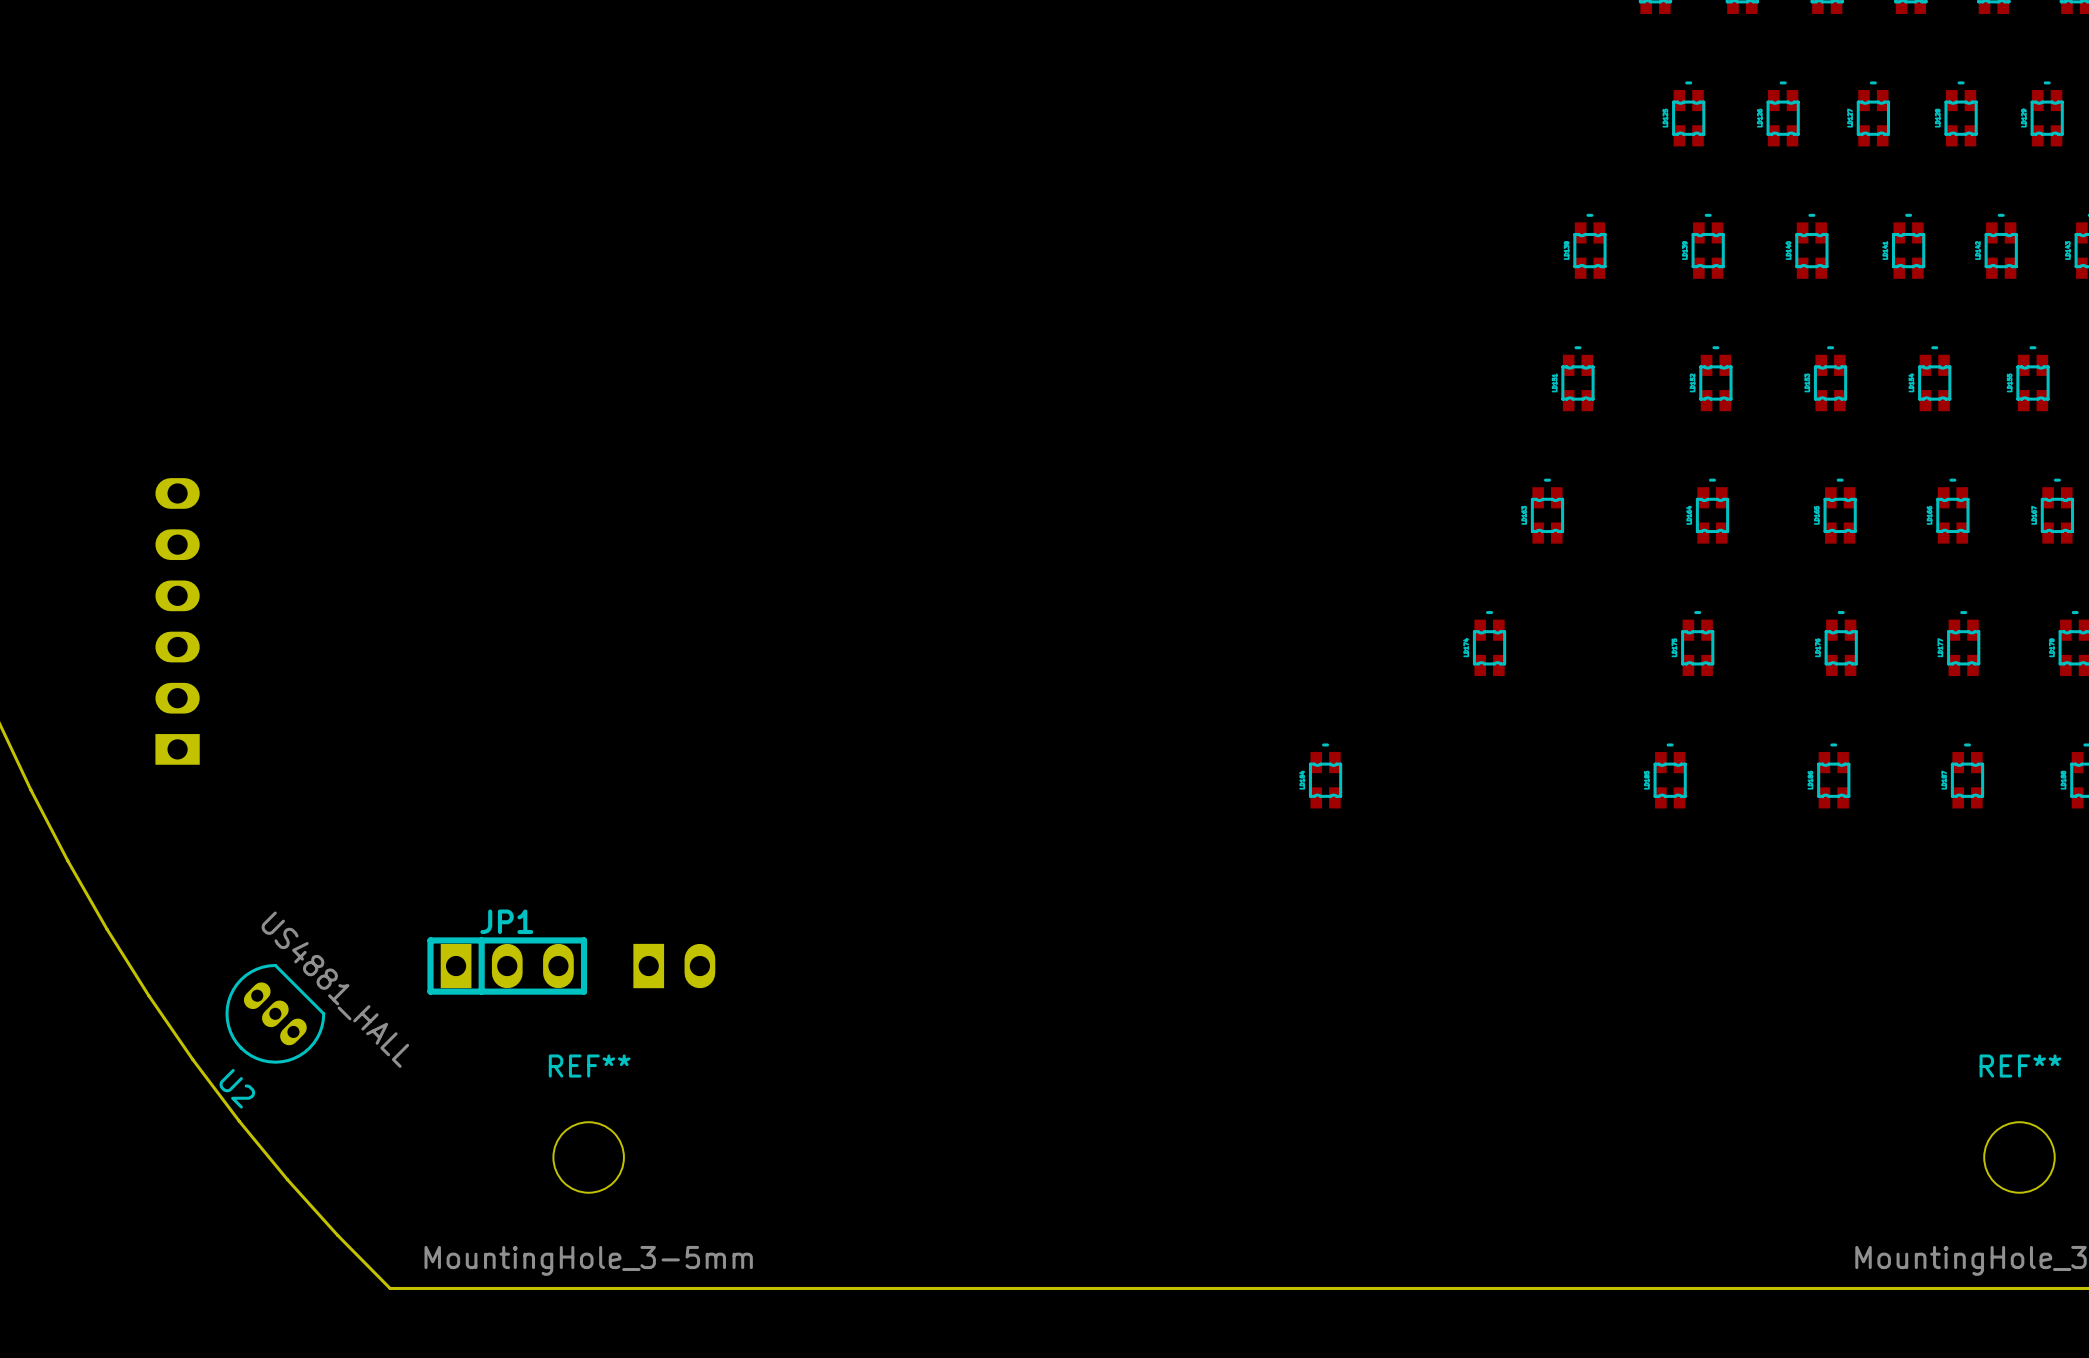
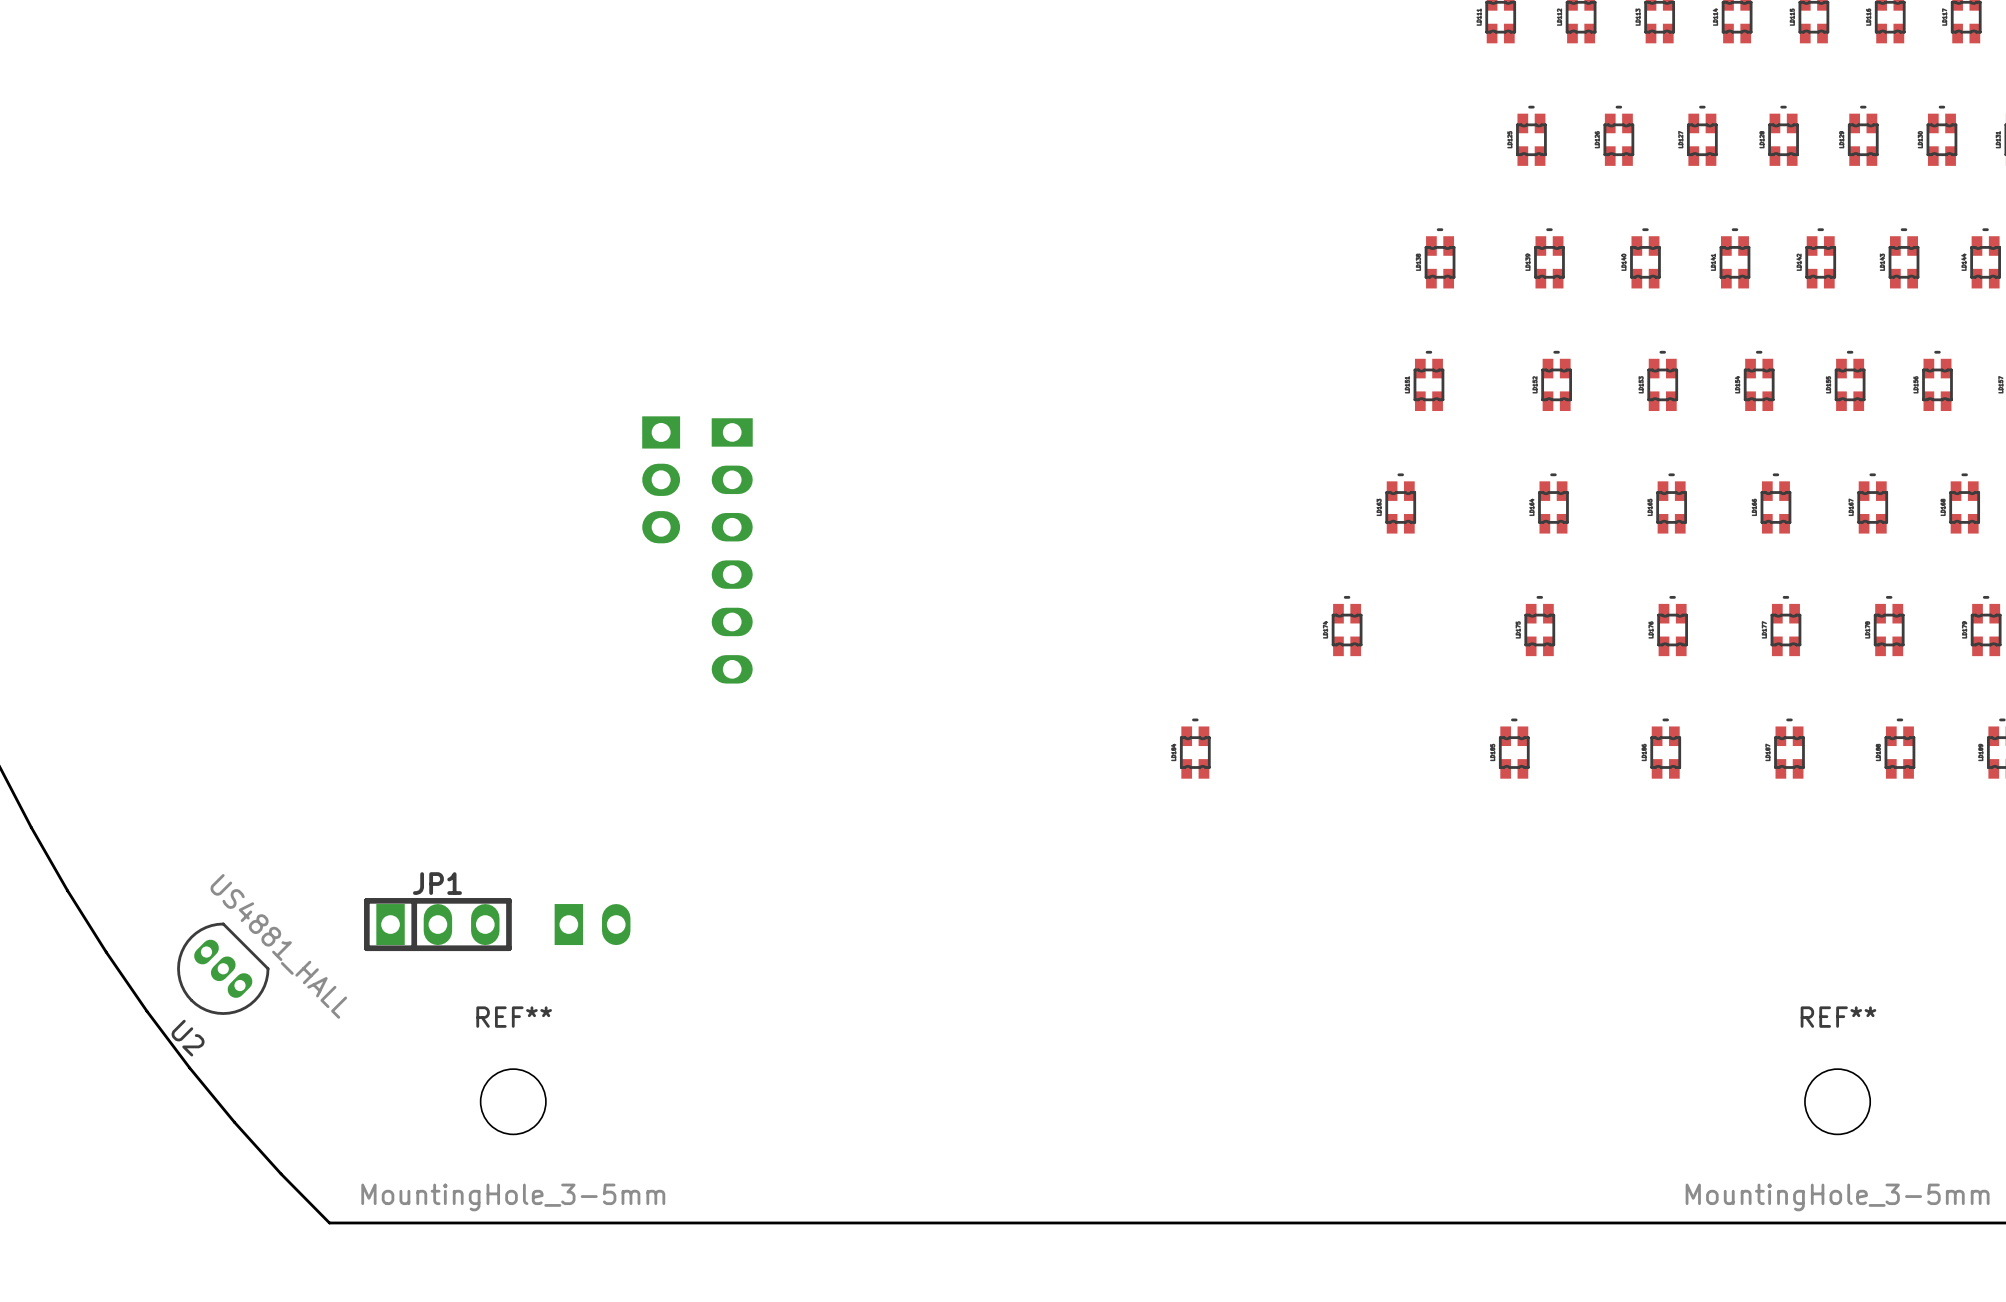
part: none -> (661, 479)
part: none -> (732, 550)
part: (177, 621) -> none

